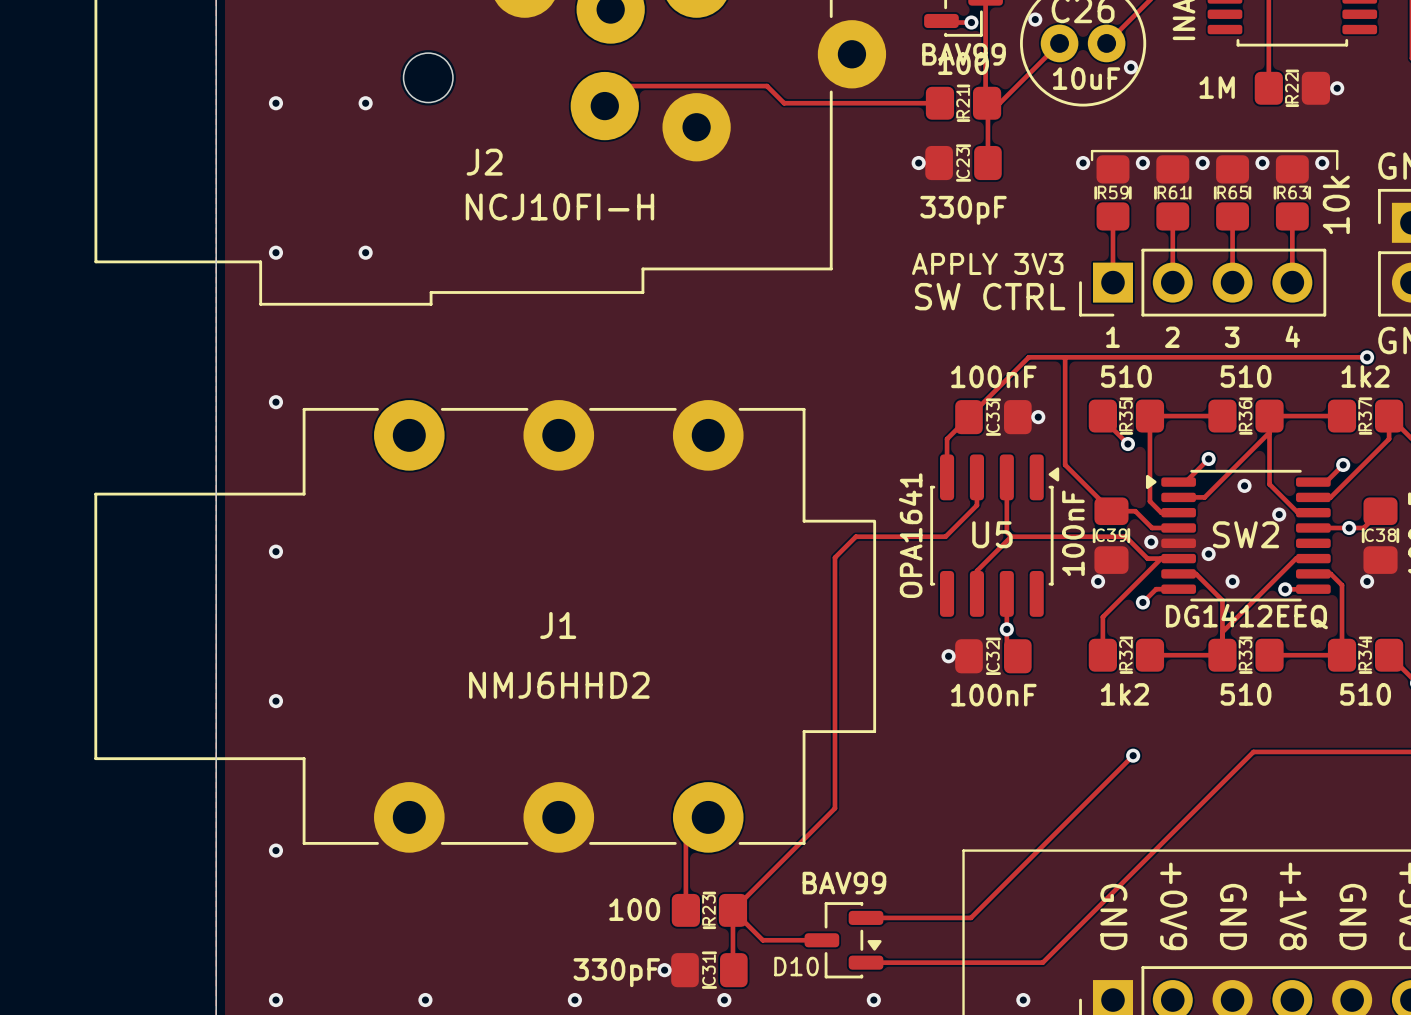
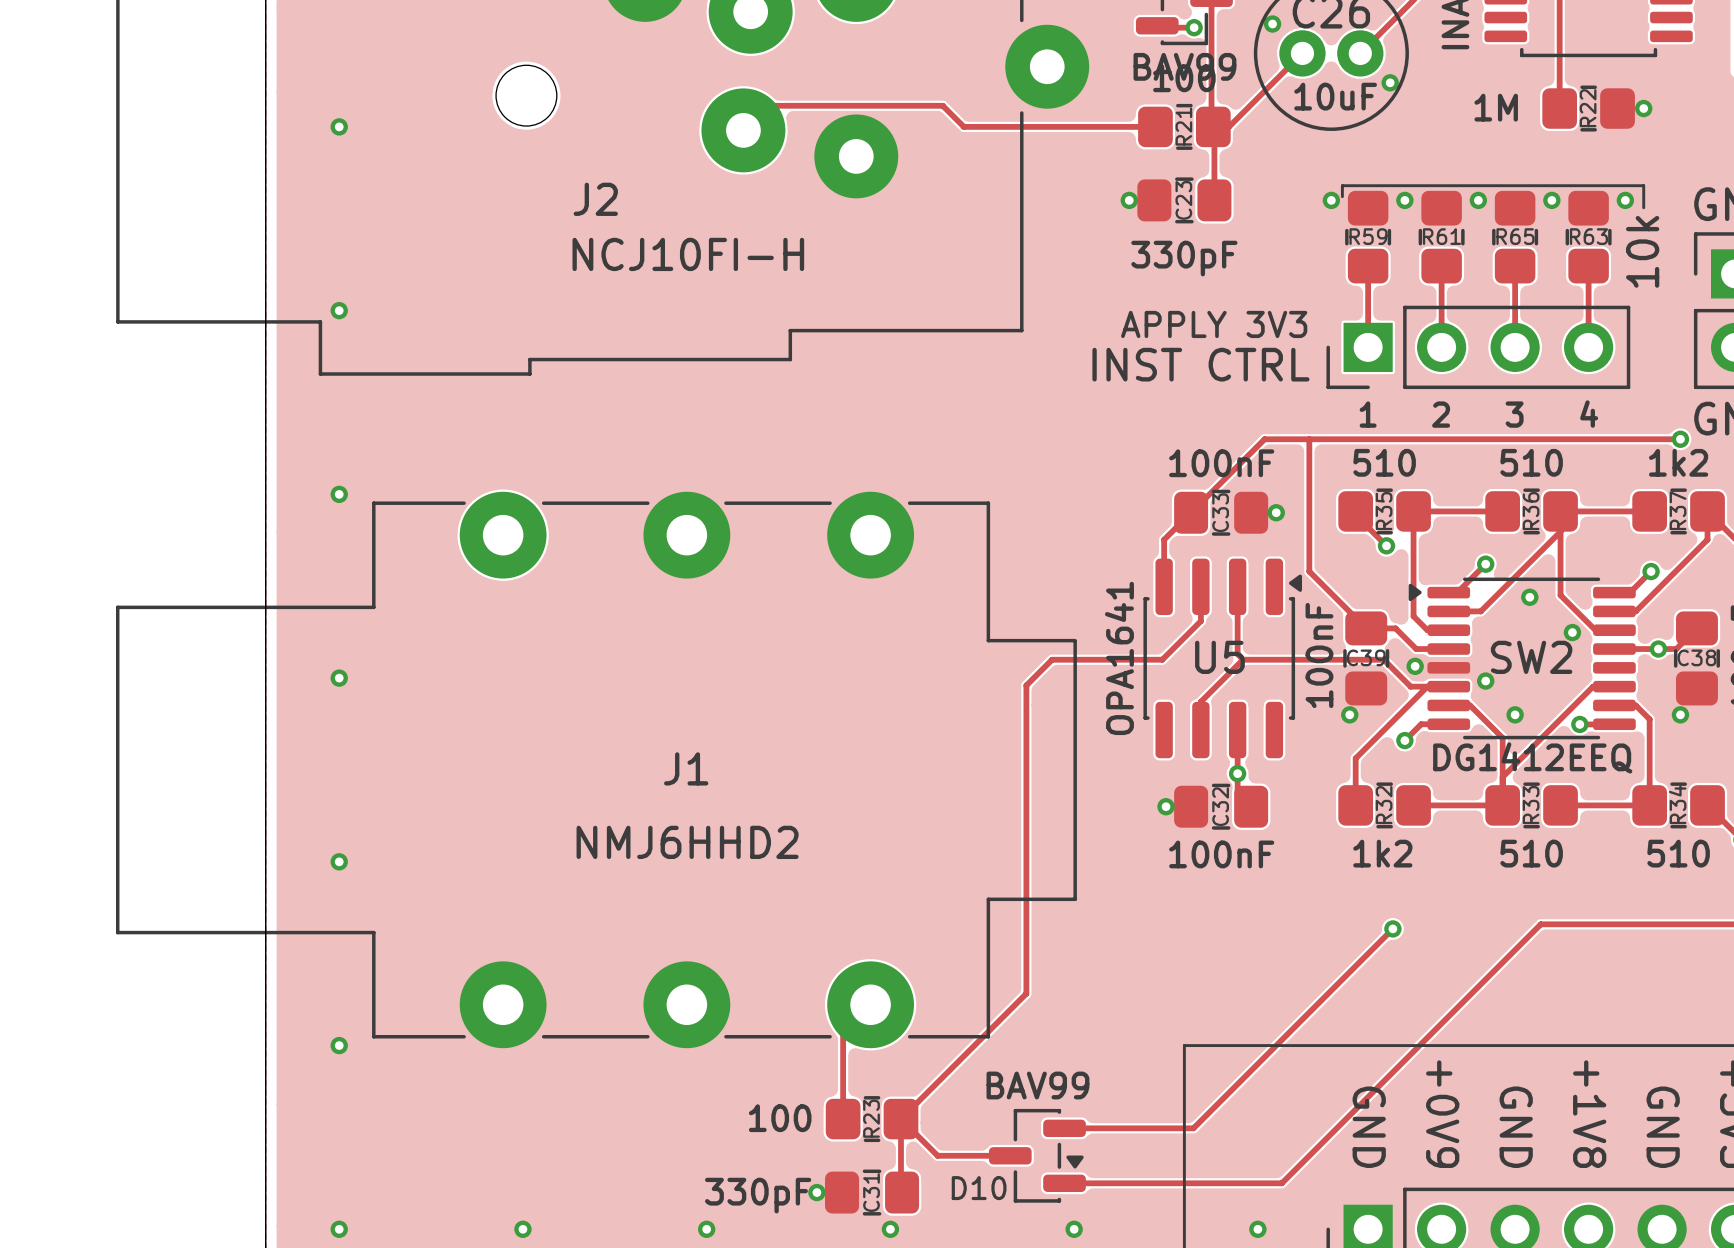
via: (365, 103) -> none
via: (365, 252) -> none
part value: SW CTRL (990, 296) -> INST CTRL (1200, 364)

